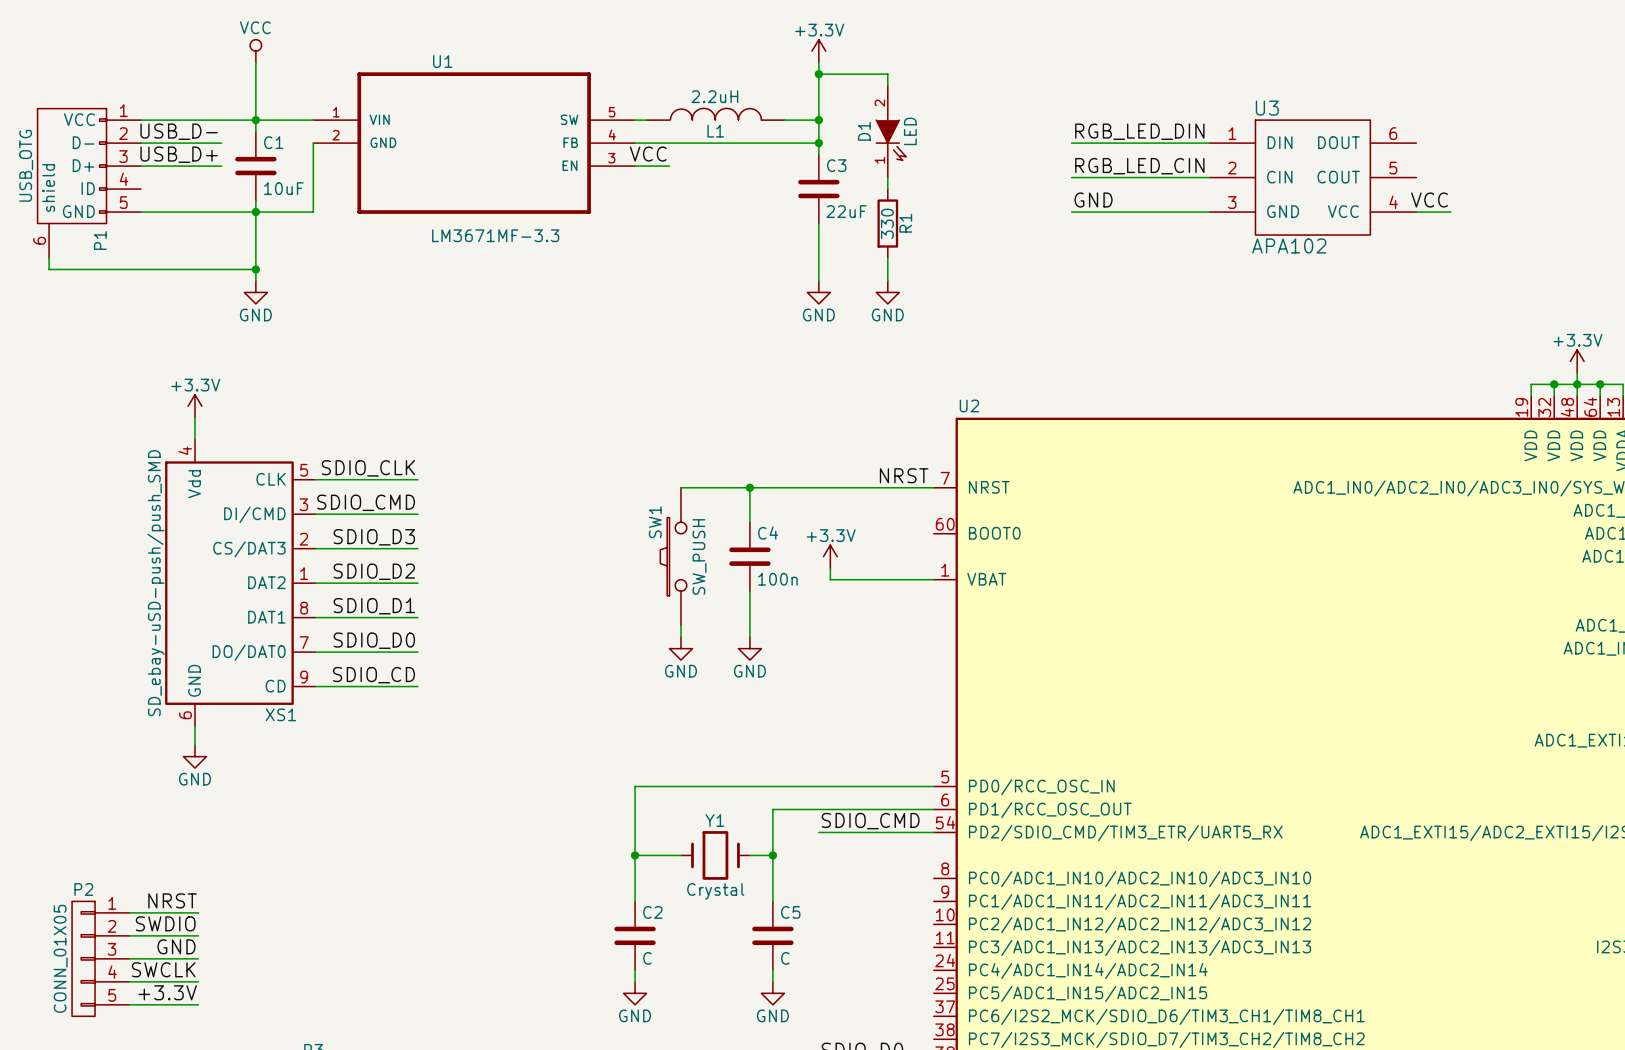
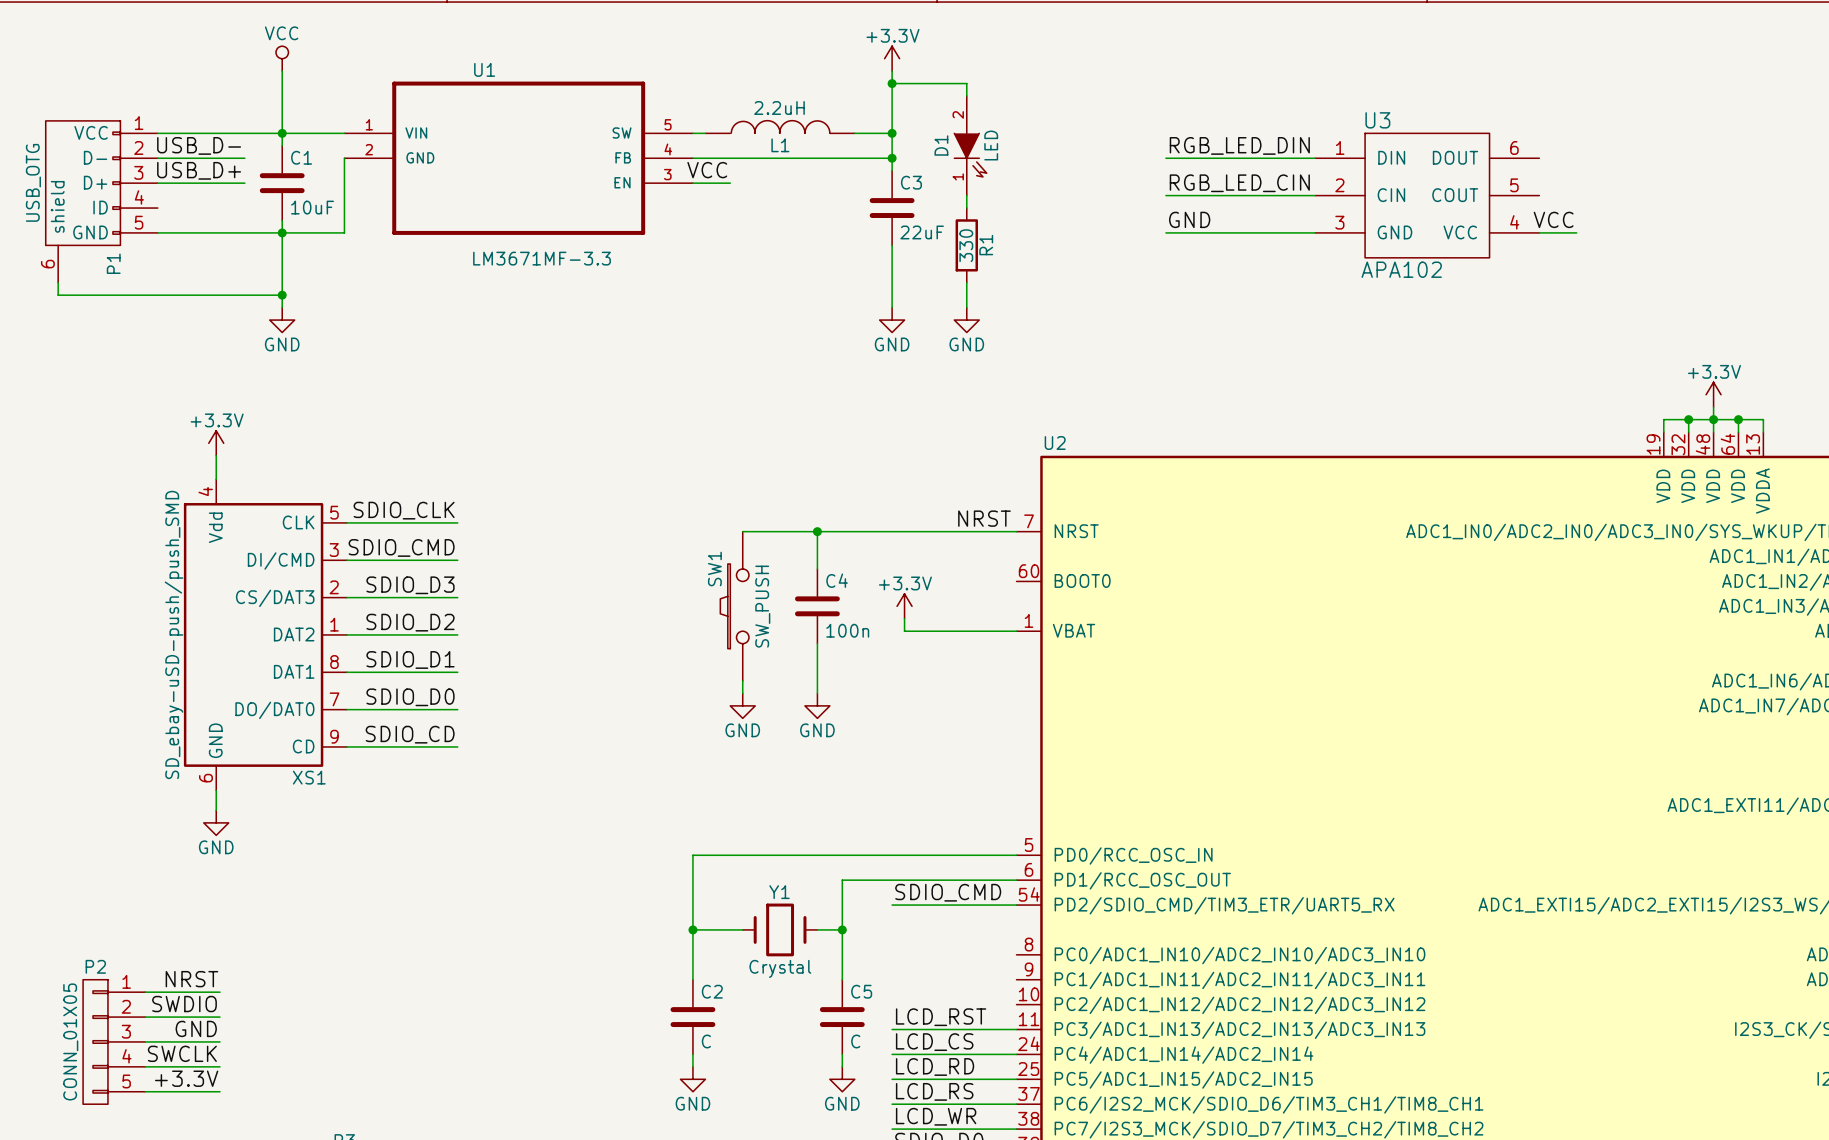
label: none -> LCD_RST (941, 1017)
wire: none -> (892, 1029) (1016, 1029)
label: none -> LCD_CS (934, 1042)
wire: none -> (892, 1054) (1016, 1054)
label: none -> LCD_RD (935, 1066)
wire: none -> (892, 1079) (1016, 1079)
label: none -> LCD_RS (934, 1091)
wire: none -> (892, 1104) (1016, 1104)
label: none -> LCD_WR (936, 1116)
wire: none -> (892, 1129) (1016, 1129)

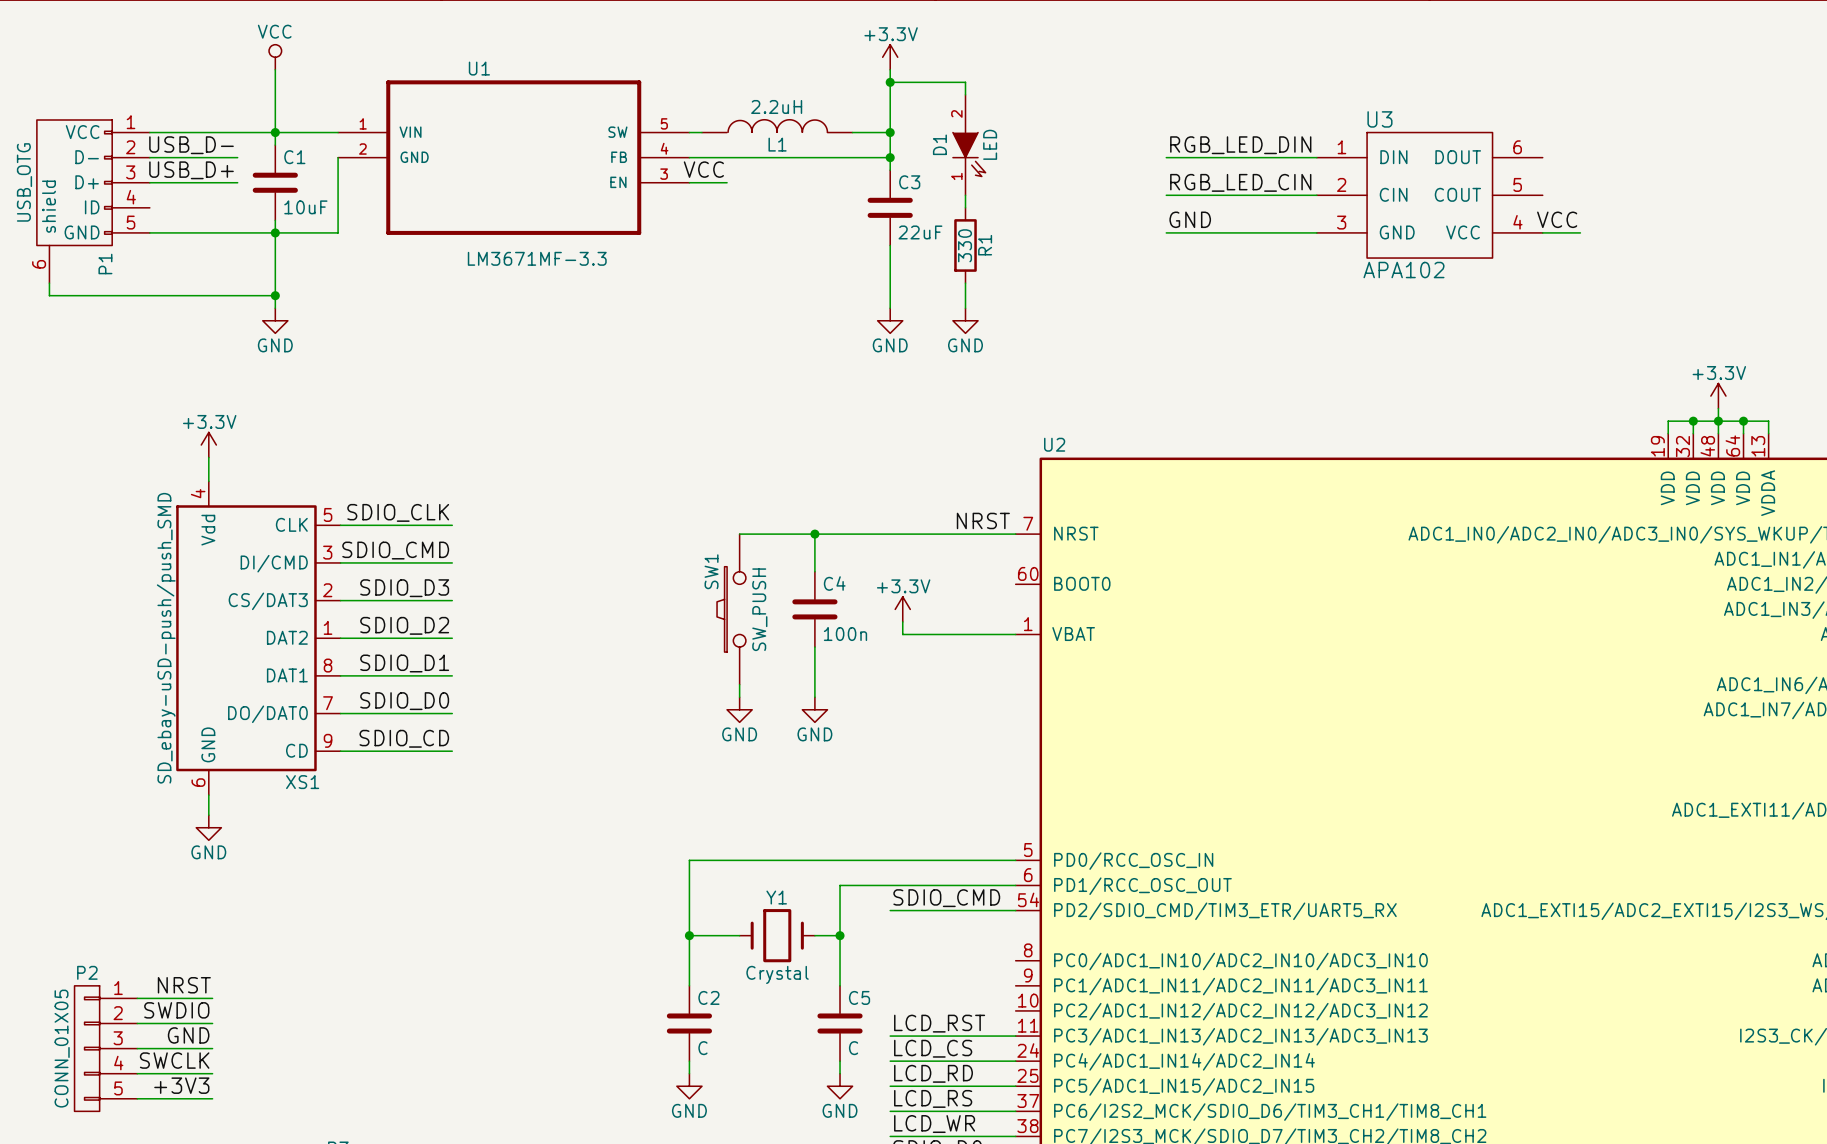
label: +3.3V (186, 1078) -> +3V3 (181, 1085)

